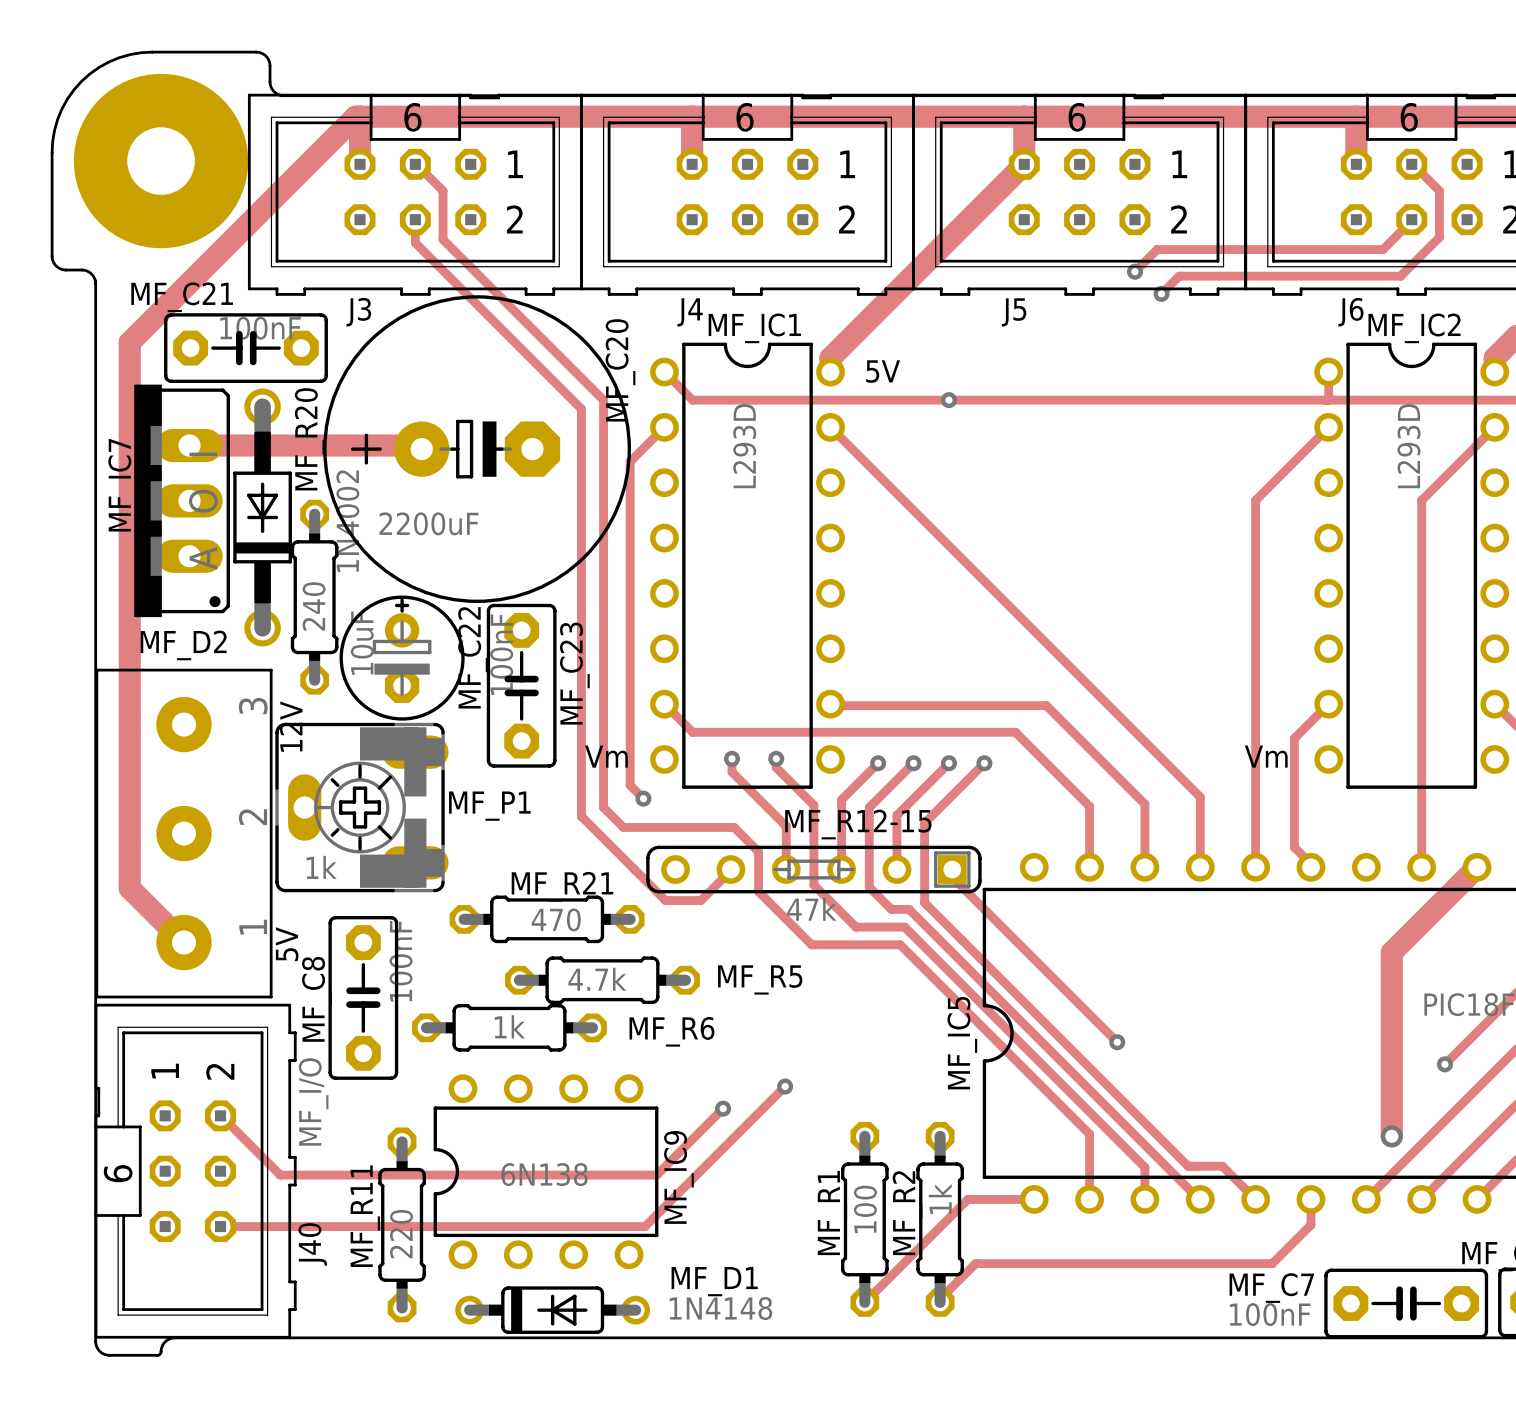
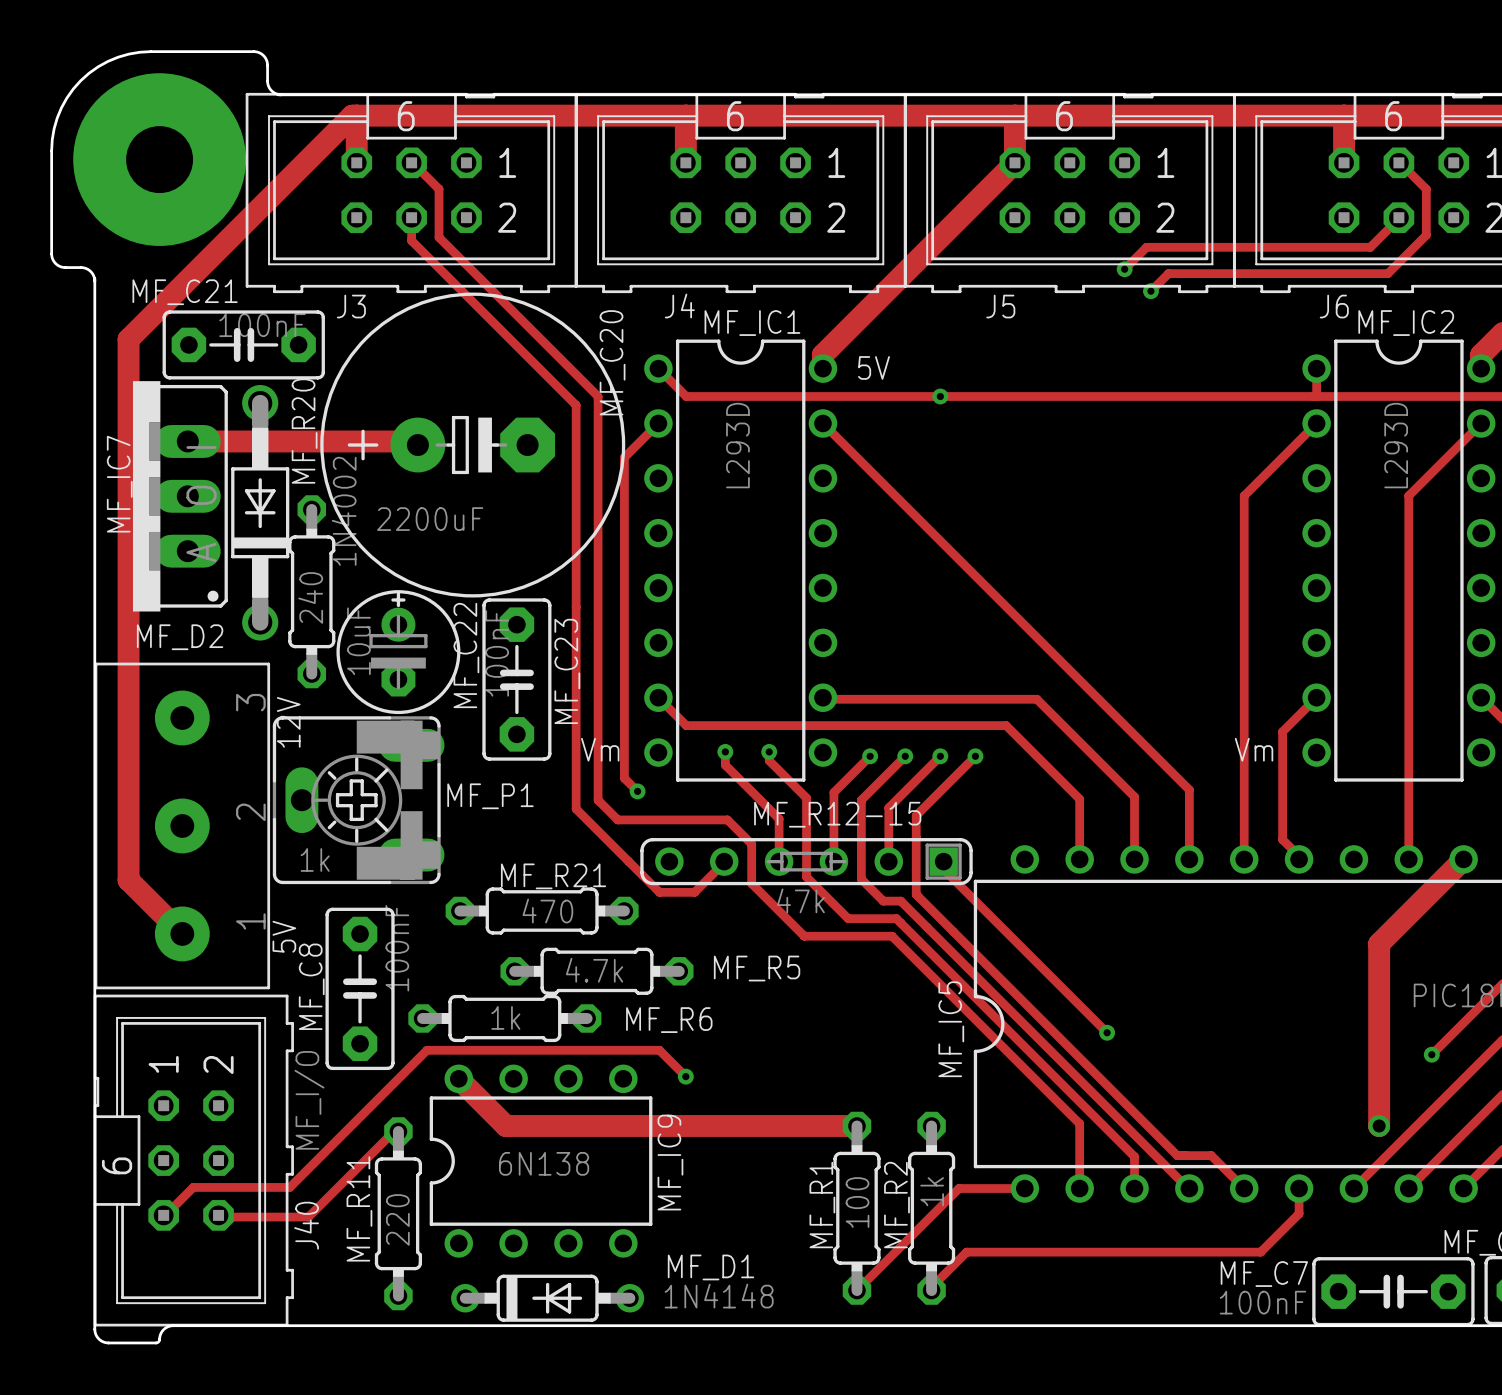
track: none -> (685, 1076) (659, 1050) (426, 1050) (289, 1187) (193, 1187) (163, 1217) (163, 1215)
track: (785, 1086) (645, 1226) (220, 1226) -> (398, 1131) (394, 1131) (308, 1217) (220, 1217) (218, 1215)
via: (785, 1086) -> none
track: none -> (458, 1078) (505, 1125) (856, 1125)
track: (723, 1108) (656, 1175) (280, 1175) (220, 1115) -> none
via position: (723, 1108) -> (685, 1076)

